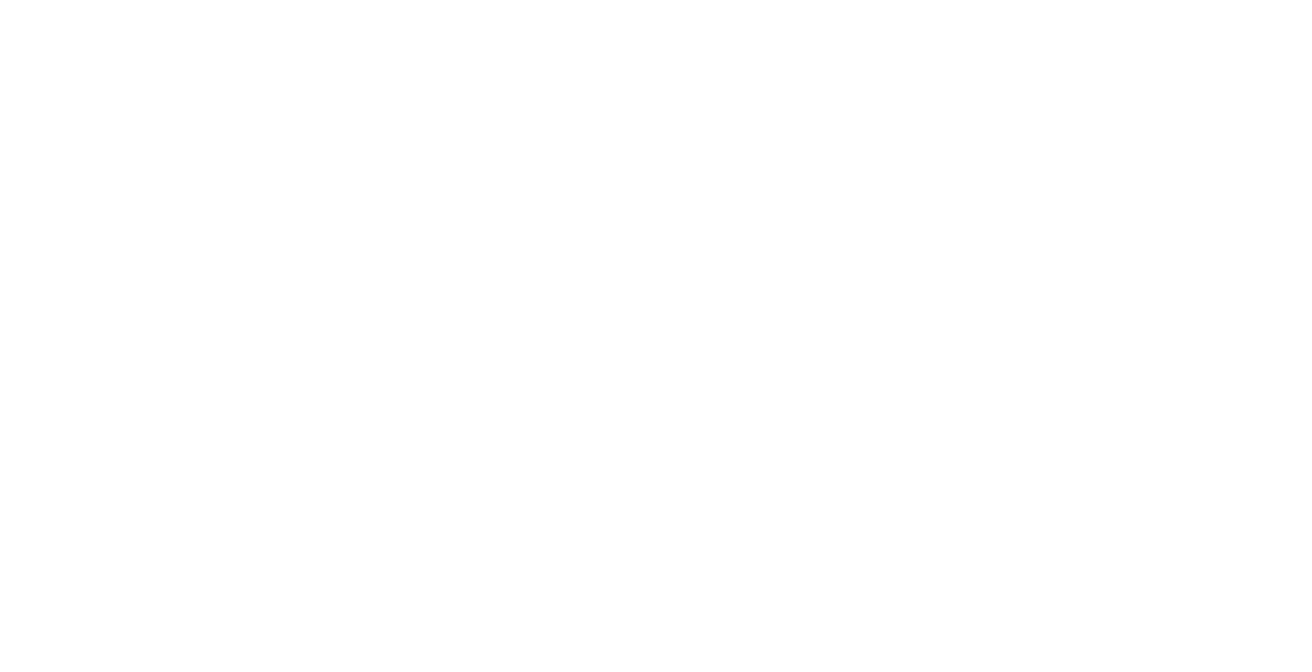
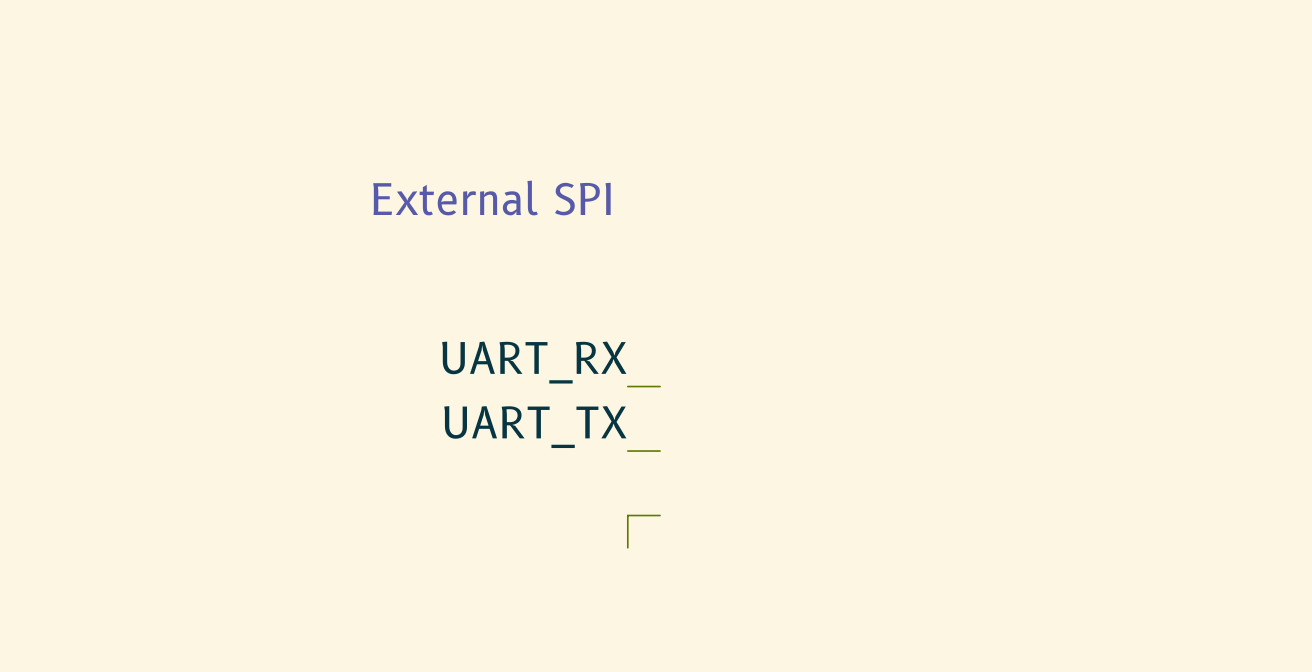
text: none -> External SPI (491, 197)
label: none -> UART_RX (534, 362)
wire: none -> (627, 386) (660, 386)
label: none -> UART_TX (535, 427)
wire: none -> (627, 451) (660, 451)
wire: none -> (660, 515) (627, 515) (627, 547)

